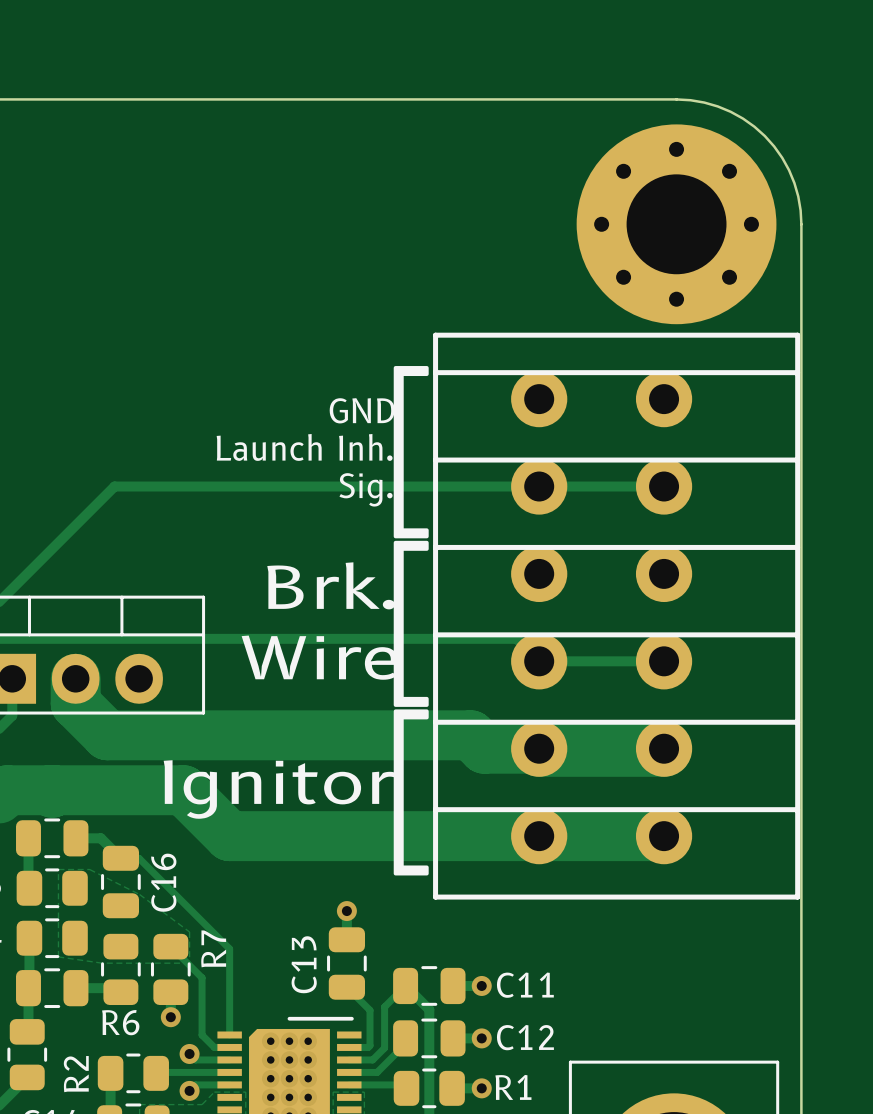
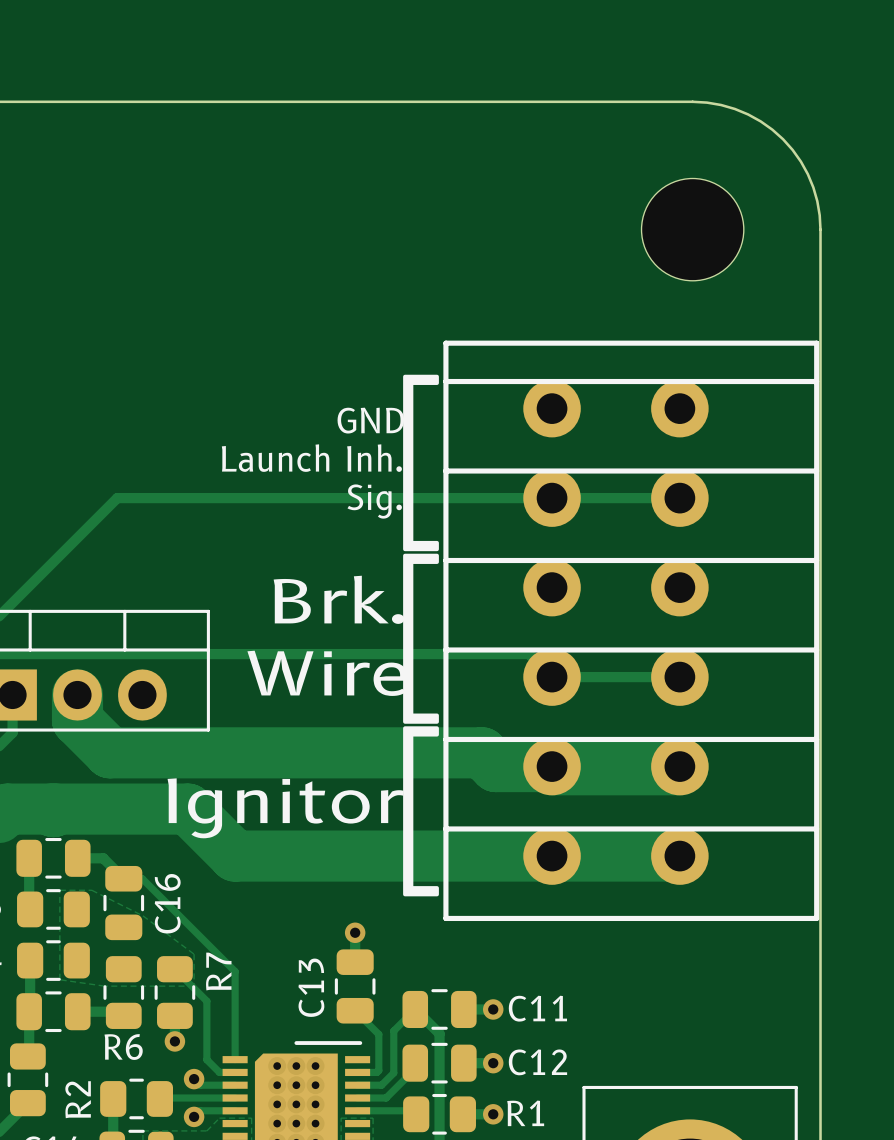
part footprint: [576, 124, 777, 325] -> [641, 178, 744, 281]

